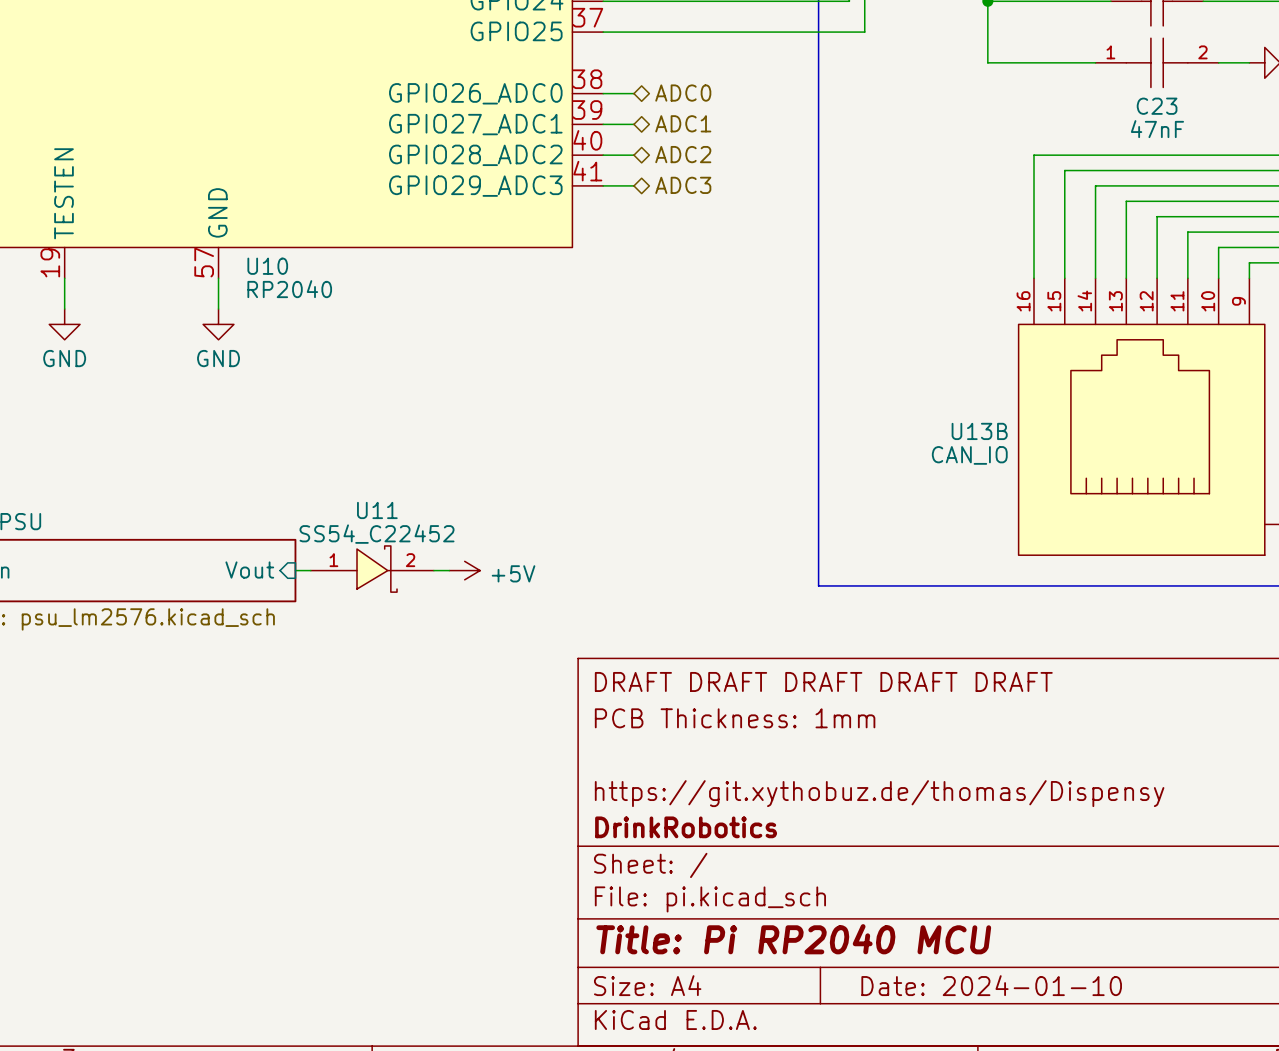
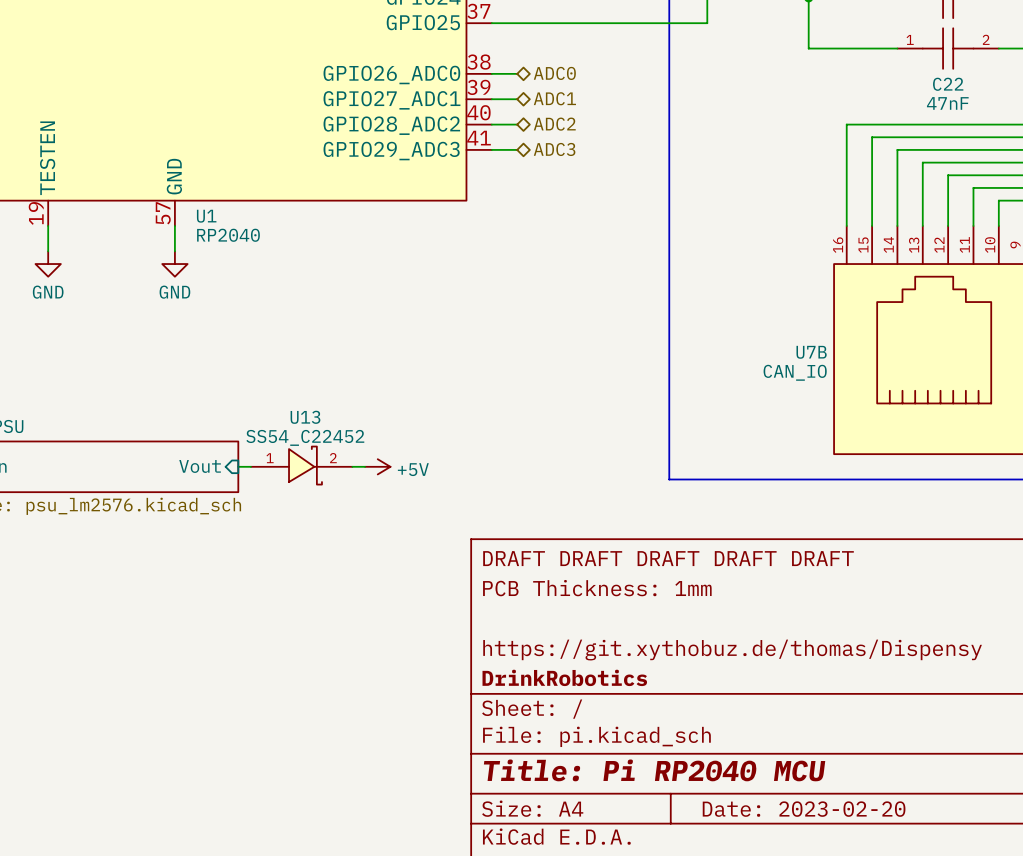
C23 name: C23 (1157, 106) -> C22 (948, 84)
U10 name: U10 (267, 266) -> U1 (206, 216)
U13B name: U13B (979, 431) -> U7B (811, 352)
U11 name: U11 (377, 510) -> U13 (305, 417)
title block: Date: 2024-01-10 (991, 985) -> Date: 2023-02-20 (804, 809)

